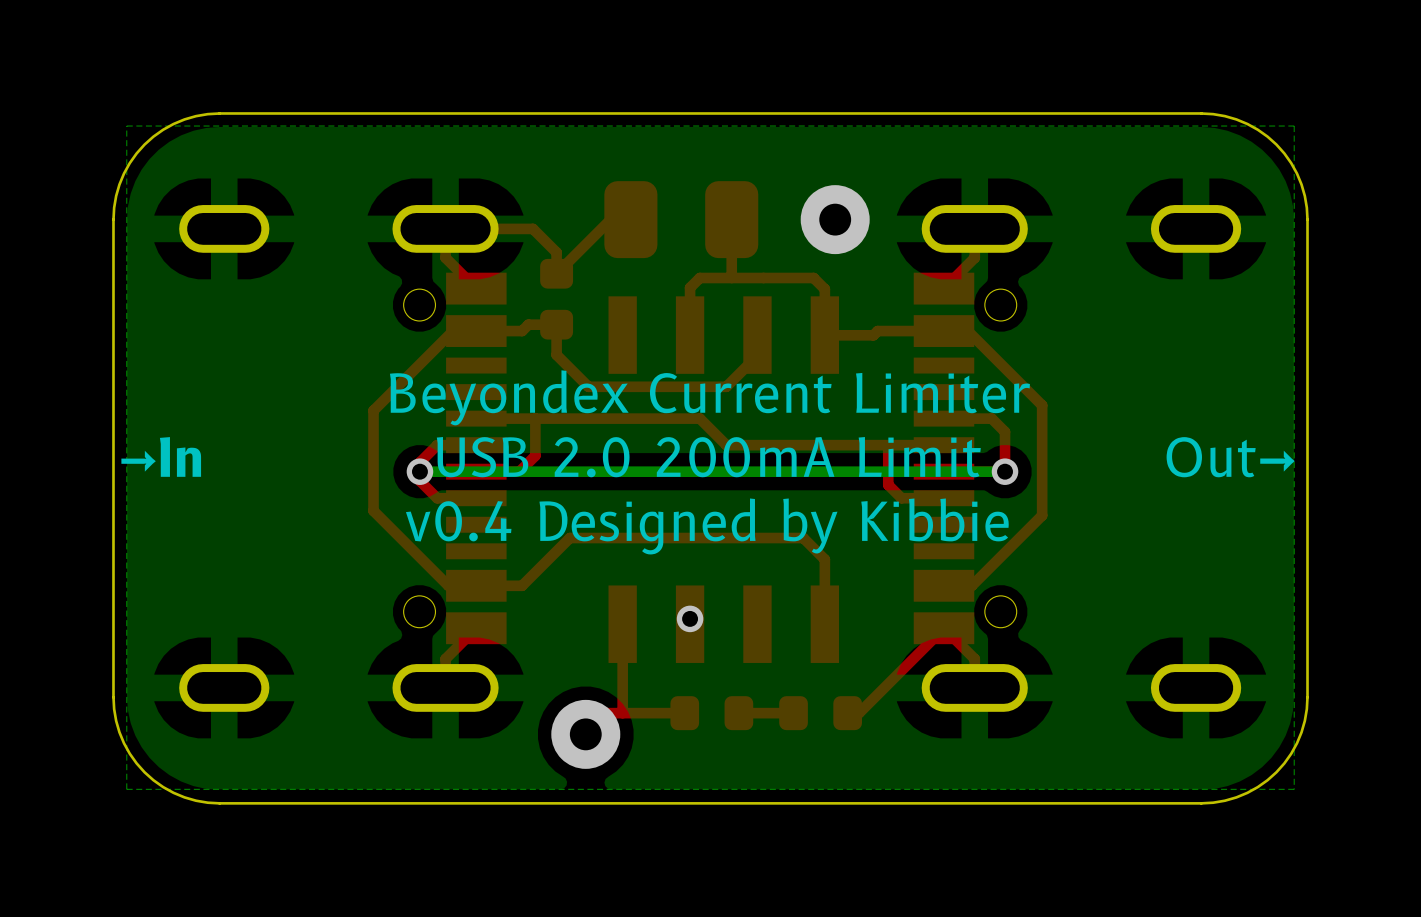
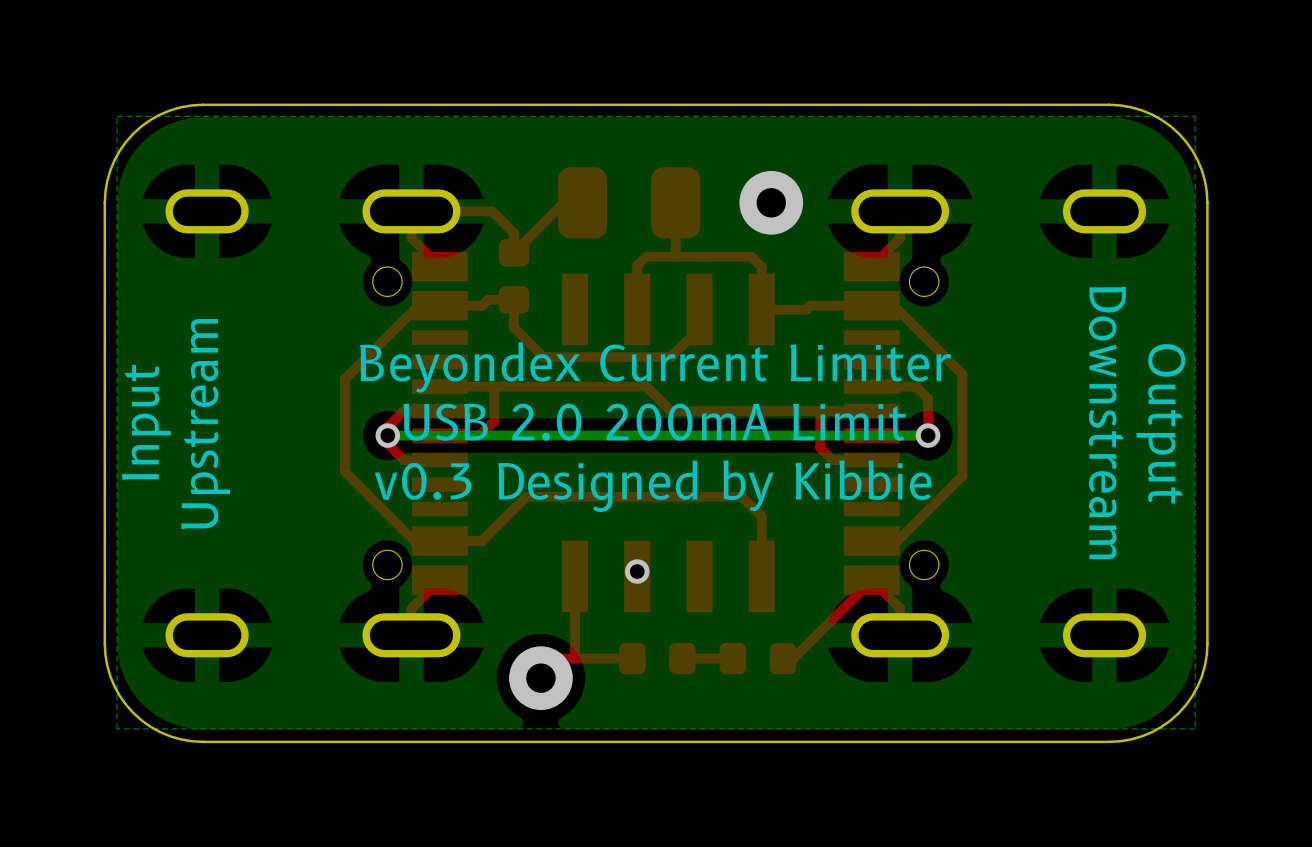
text: →In (161, 456) -> none
text: none -> Input (146, 422)
text: none -> Downstream (1107, 422)
text: Out→ (1230, 457) -> none
text: none -> Upstream (205, 424)
text: none -> Output (1160, 423)
text: v0.4 Designed by Kibbie (707, 526) -> v0.3 Designed by Kibbie (653, 486)

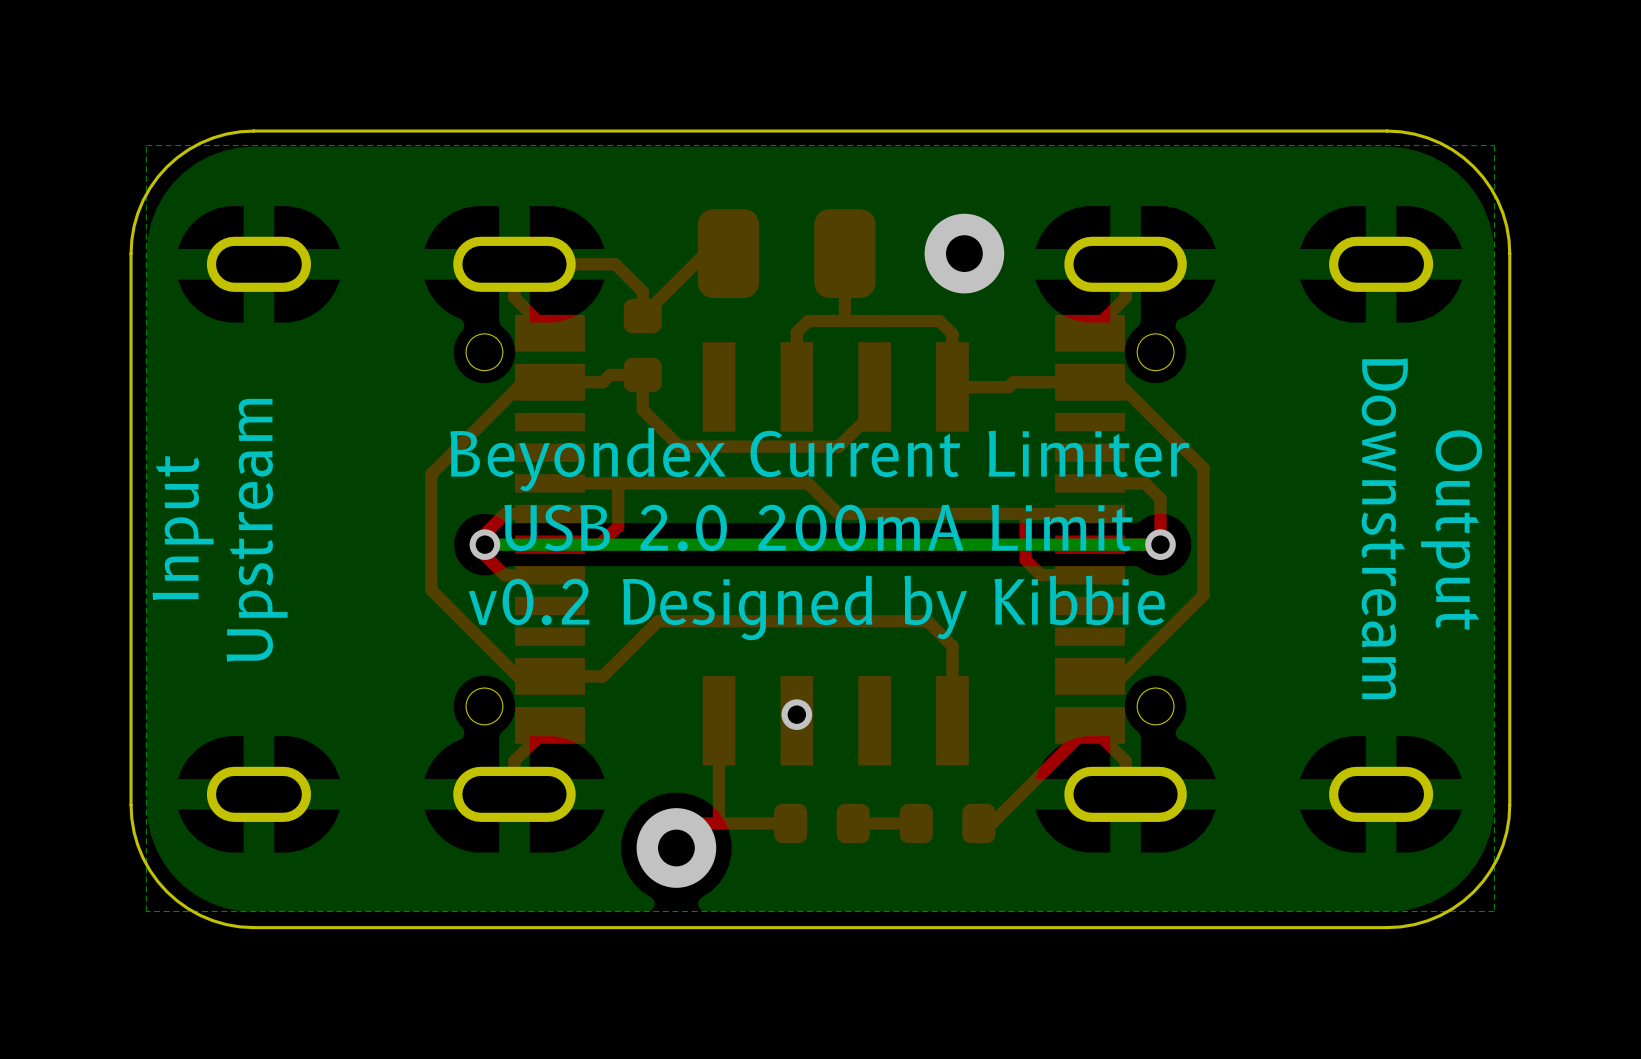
text: v0.3 Designed by Kibbie (653, 486) -> v0.2 Designed by Kibbie (816, 607)

